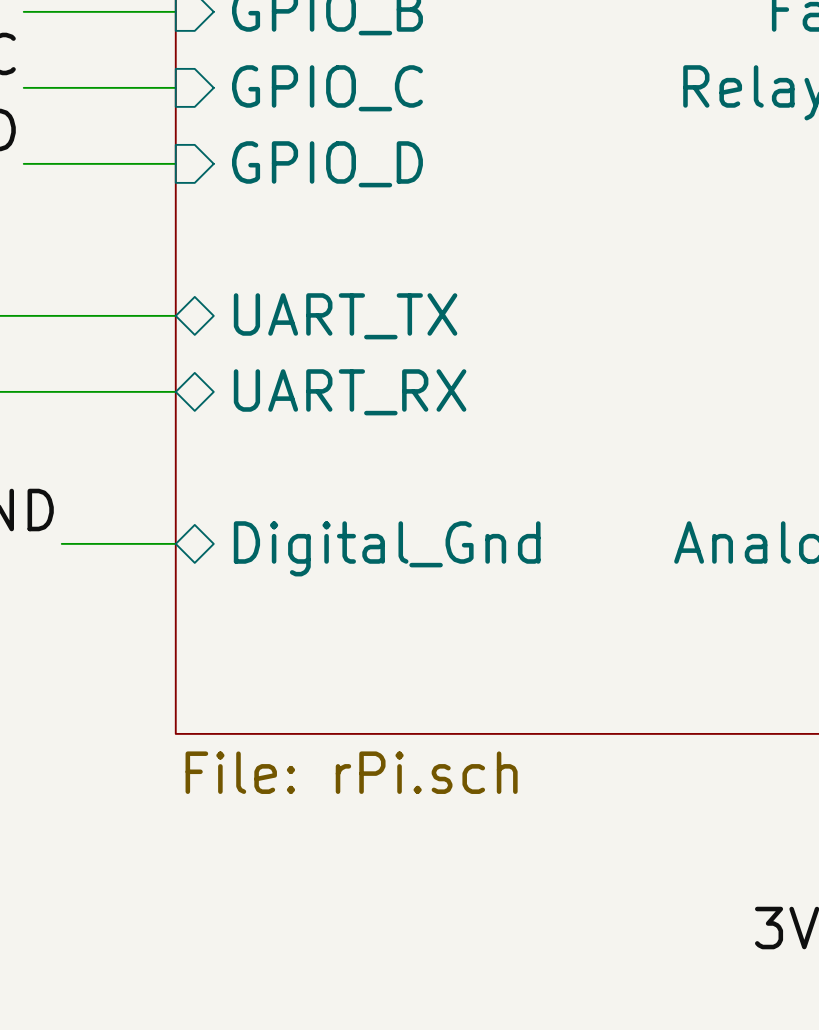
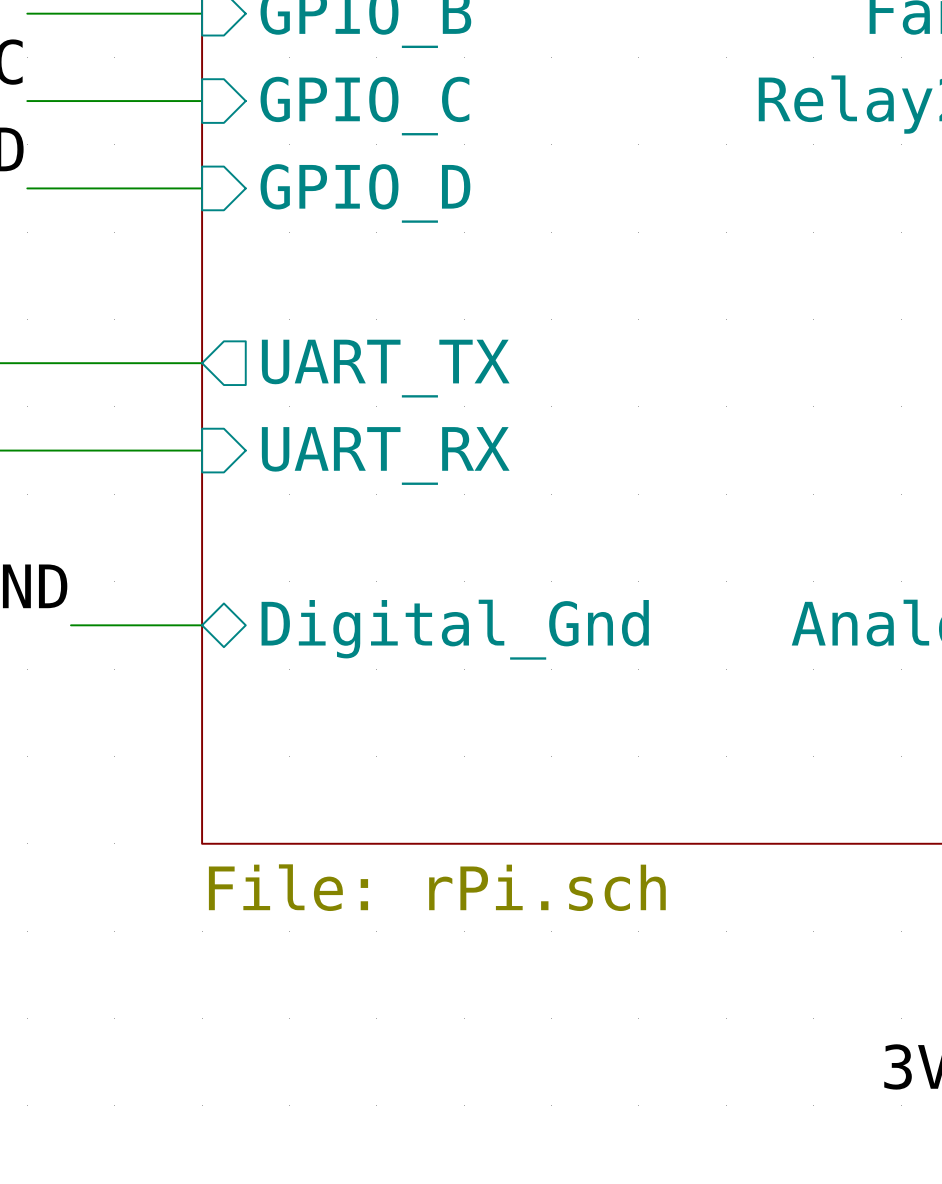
sheet pin shape: bidirectional (345, 316) -> output (385, 368)
sheet pin shape: bidirectional (350, 392) -> input (385, 455)

